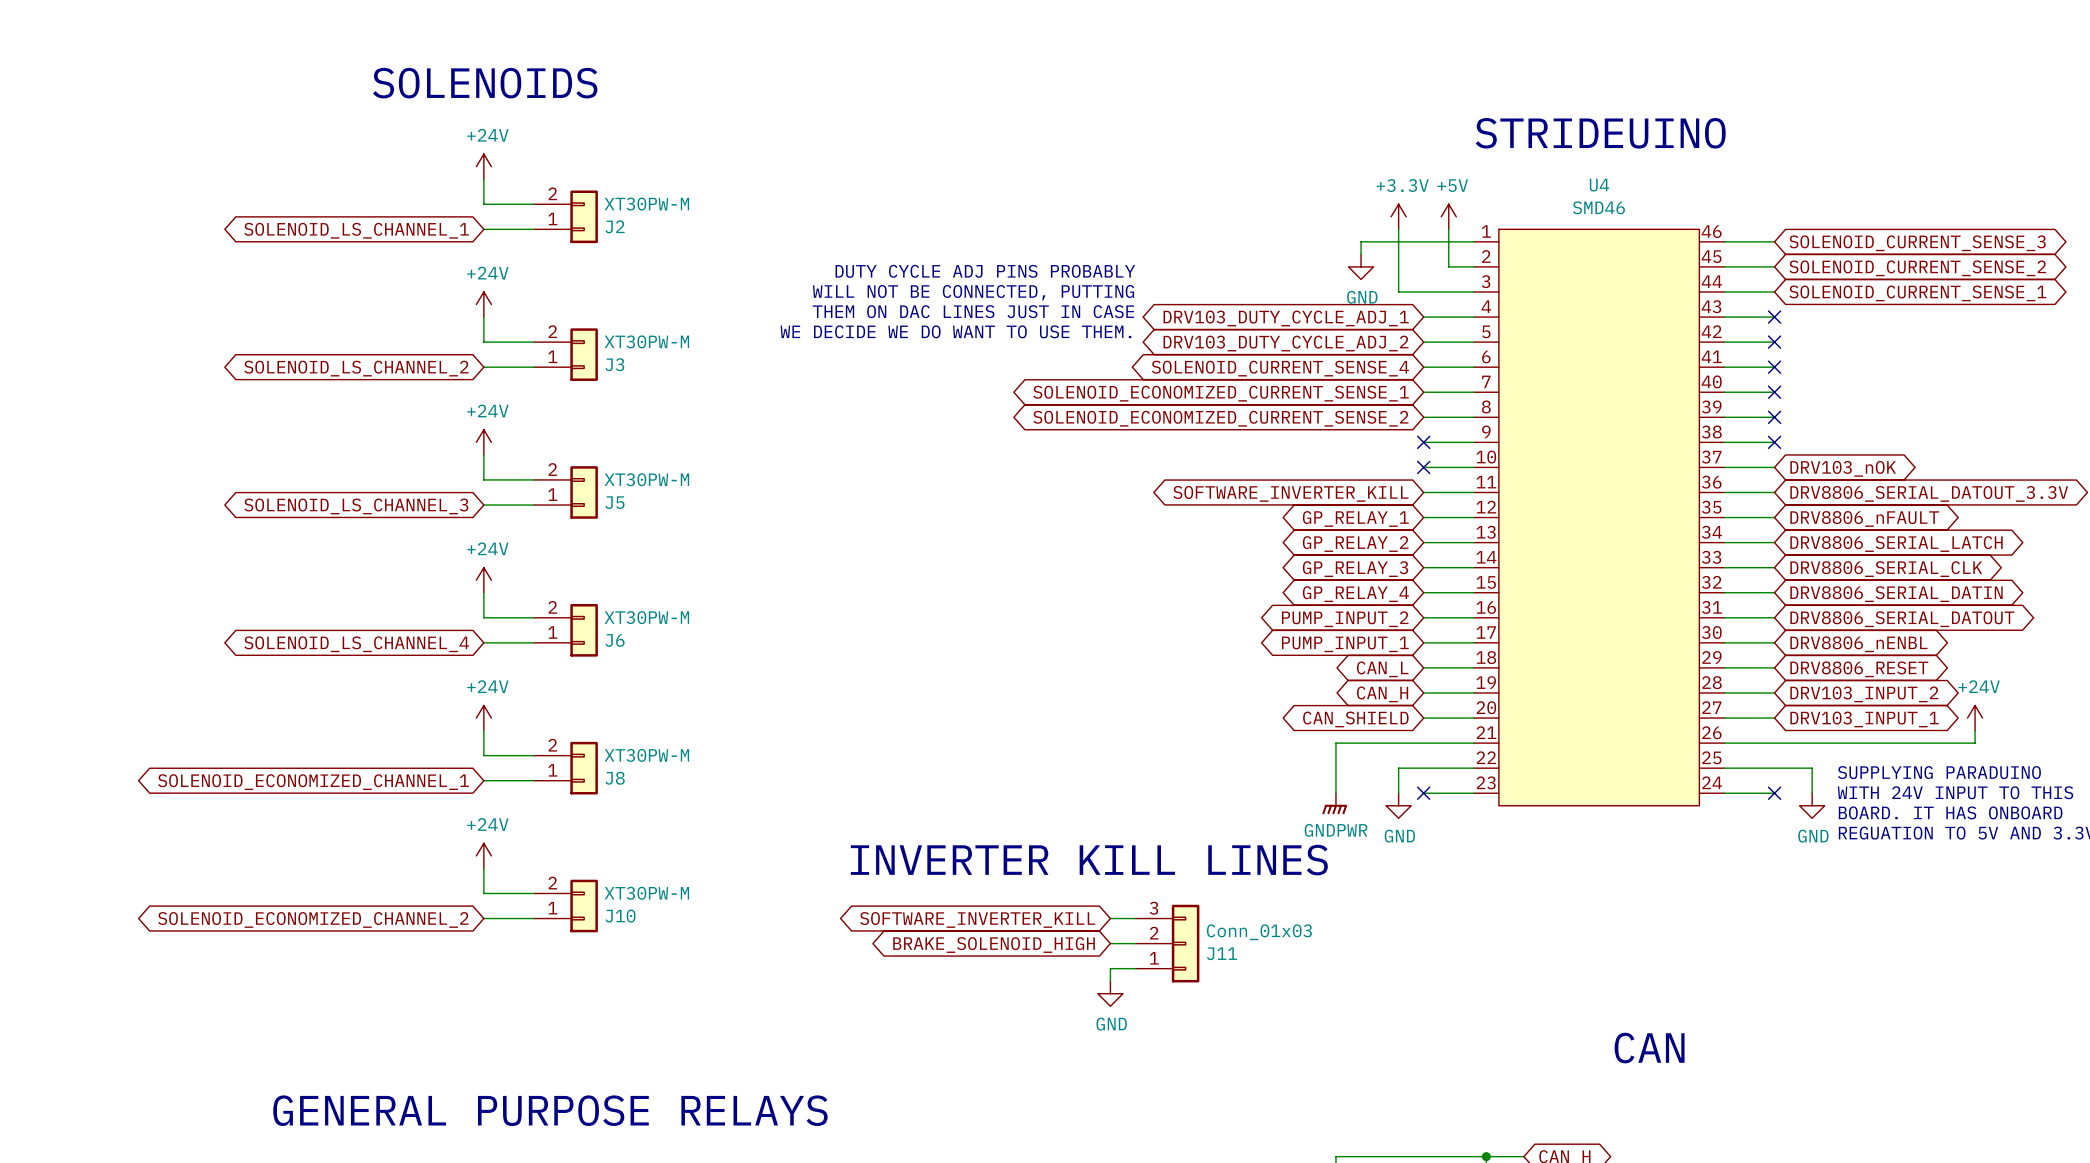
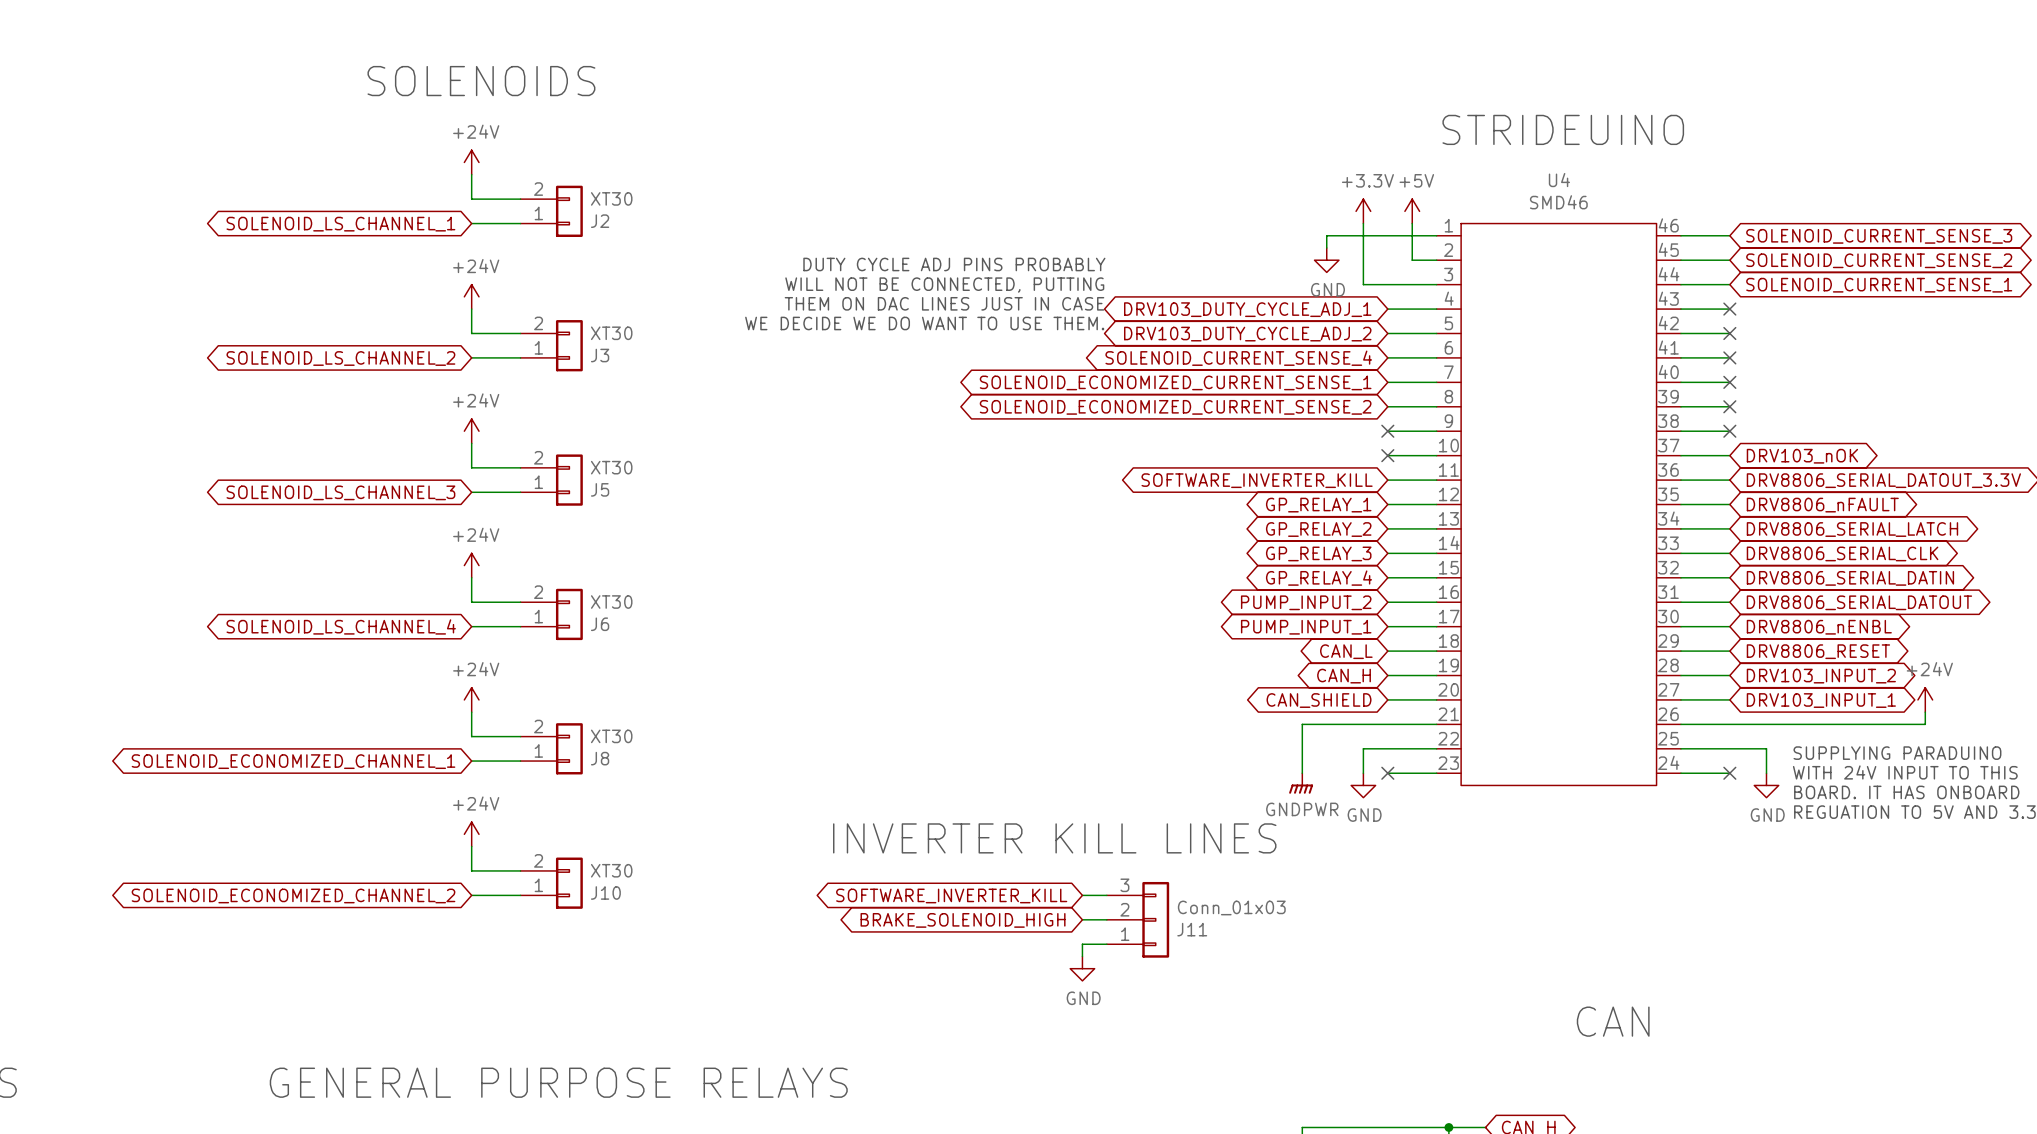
J2 value: XT30PW-M (646, 204) -> XT30 (611, 198)
J3 value: XT30PW-M (646, 341) -> XT30 (611, 333)
J5 value: XT30PW-M (646, 479) -> XT30 (611, 467)
J6 value: XT30PW-M (646, 617) -> XT30 (611, 602)
J8 value: XT30PW-M (646, 755) -> XT30 (611, 736)
J10 value: XT30PW-M (646, 893) -> XT30 (611, 870)

